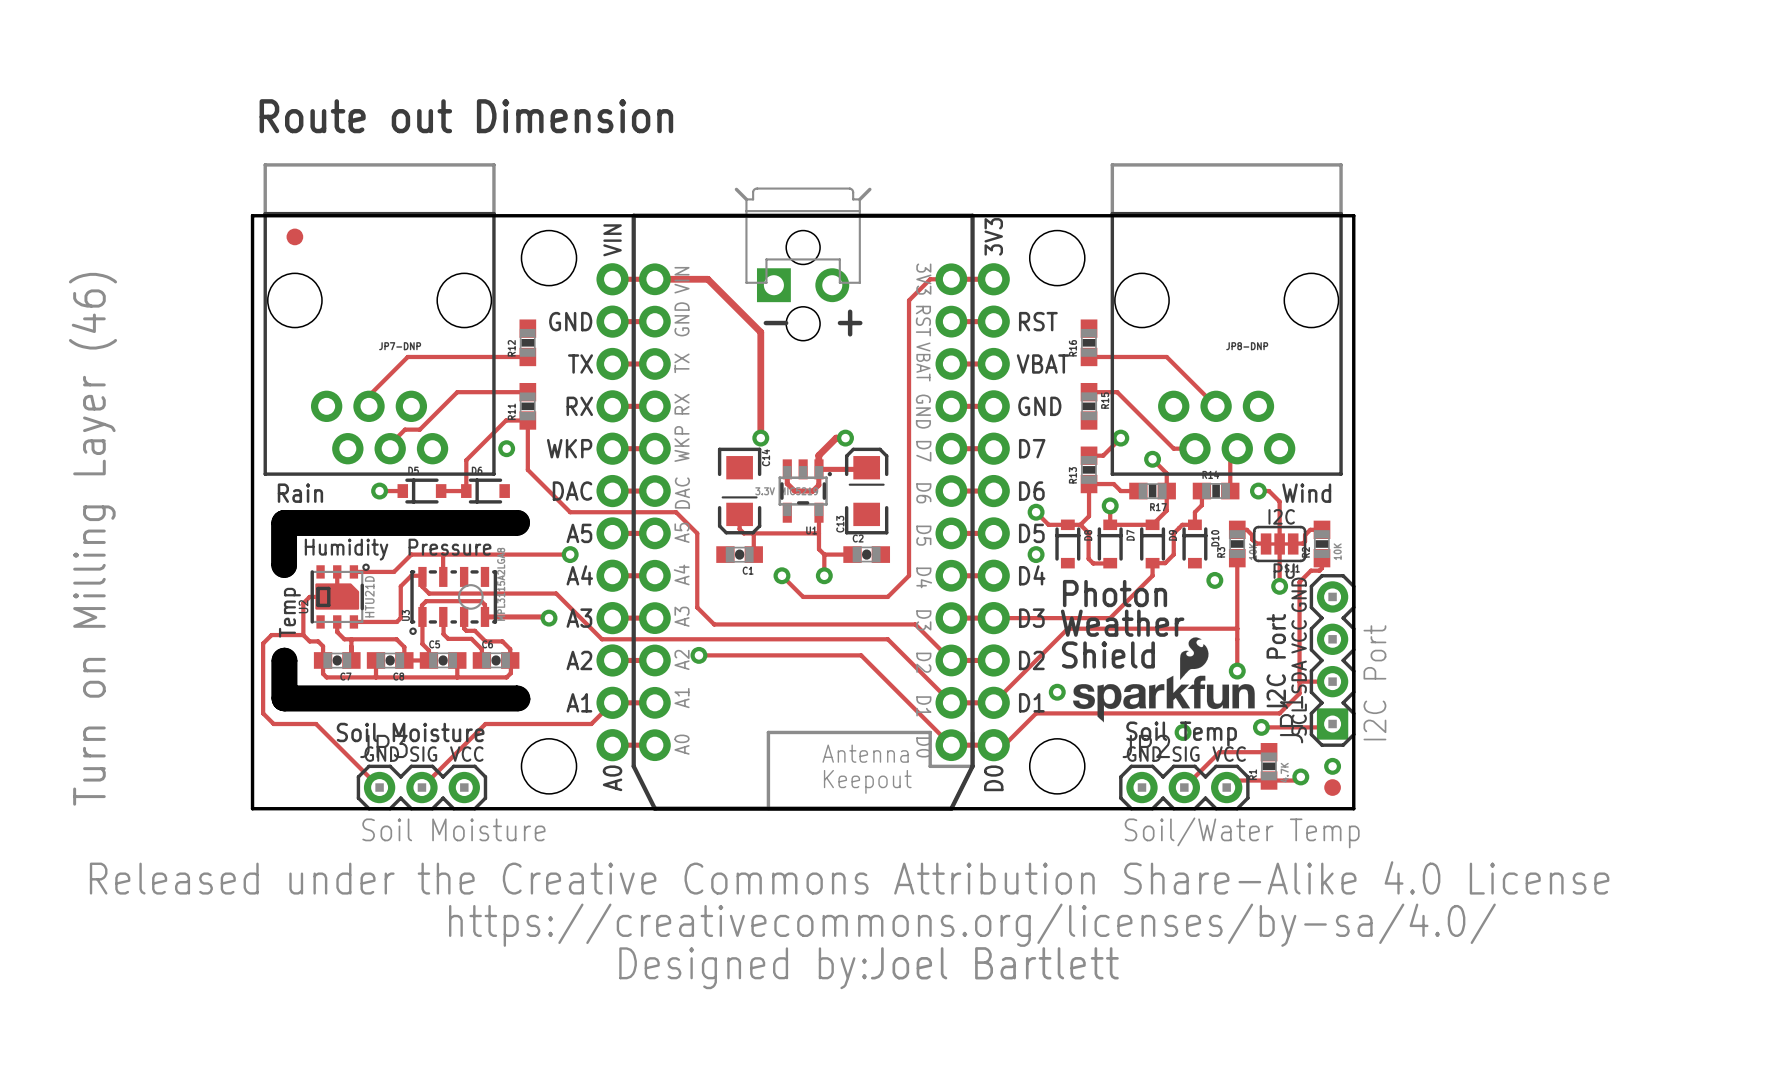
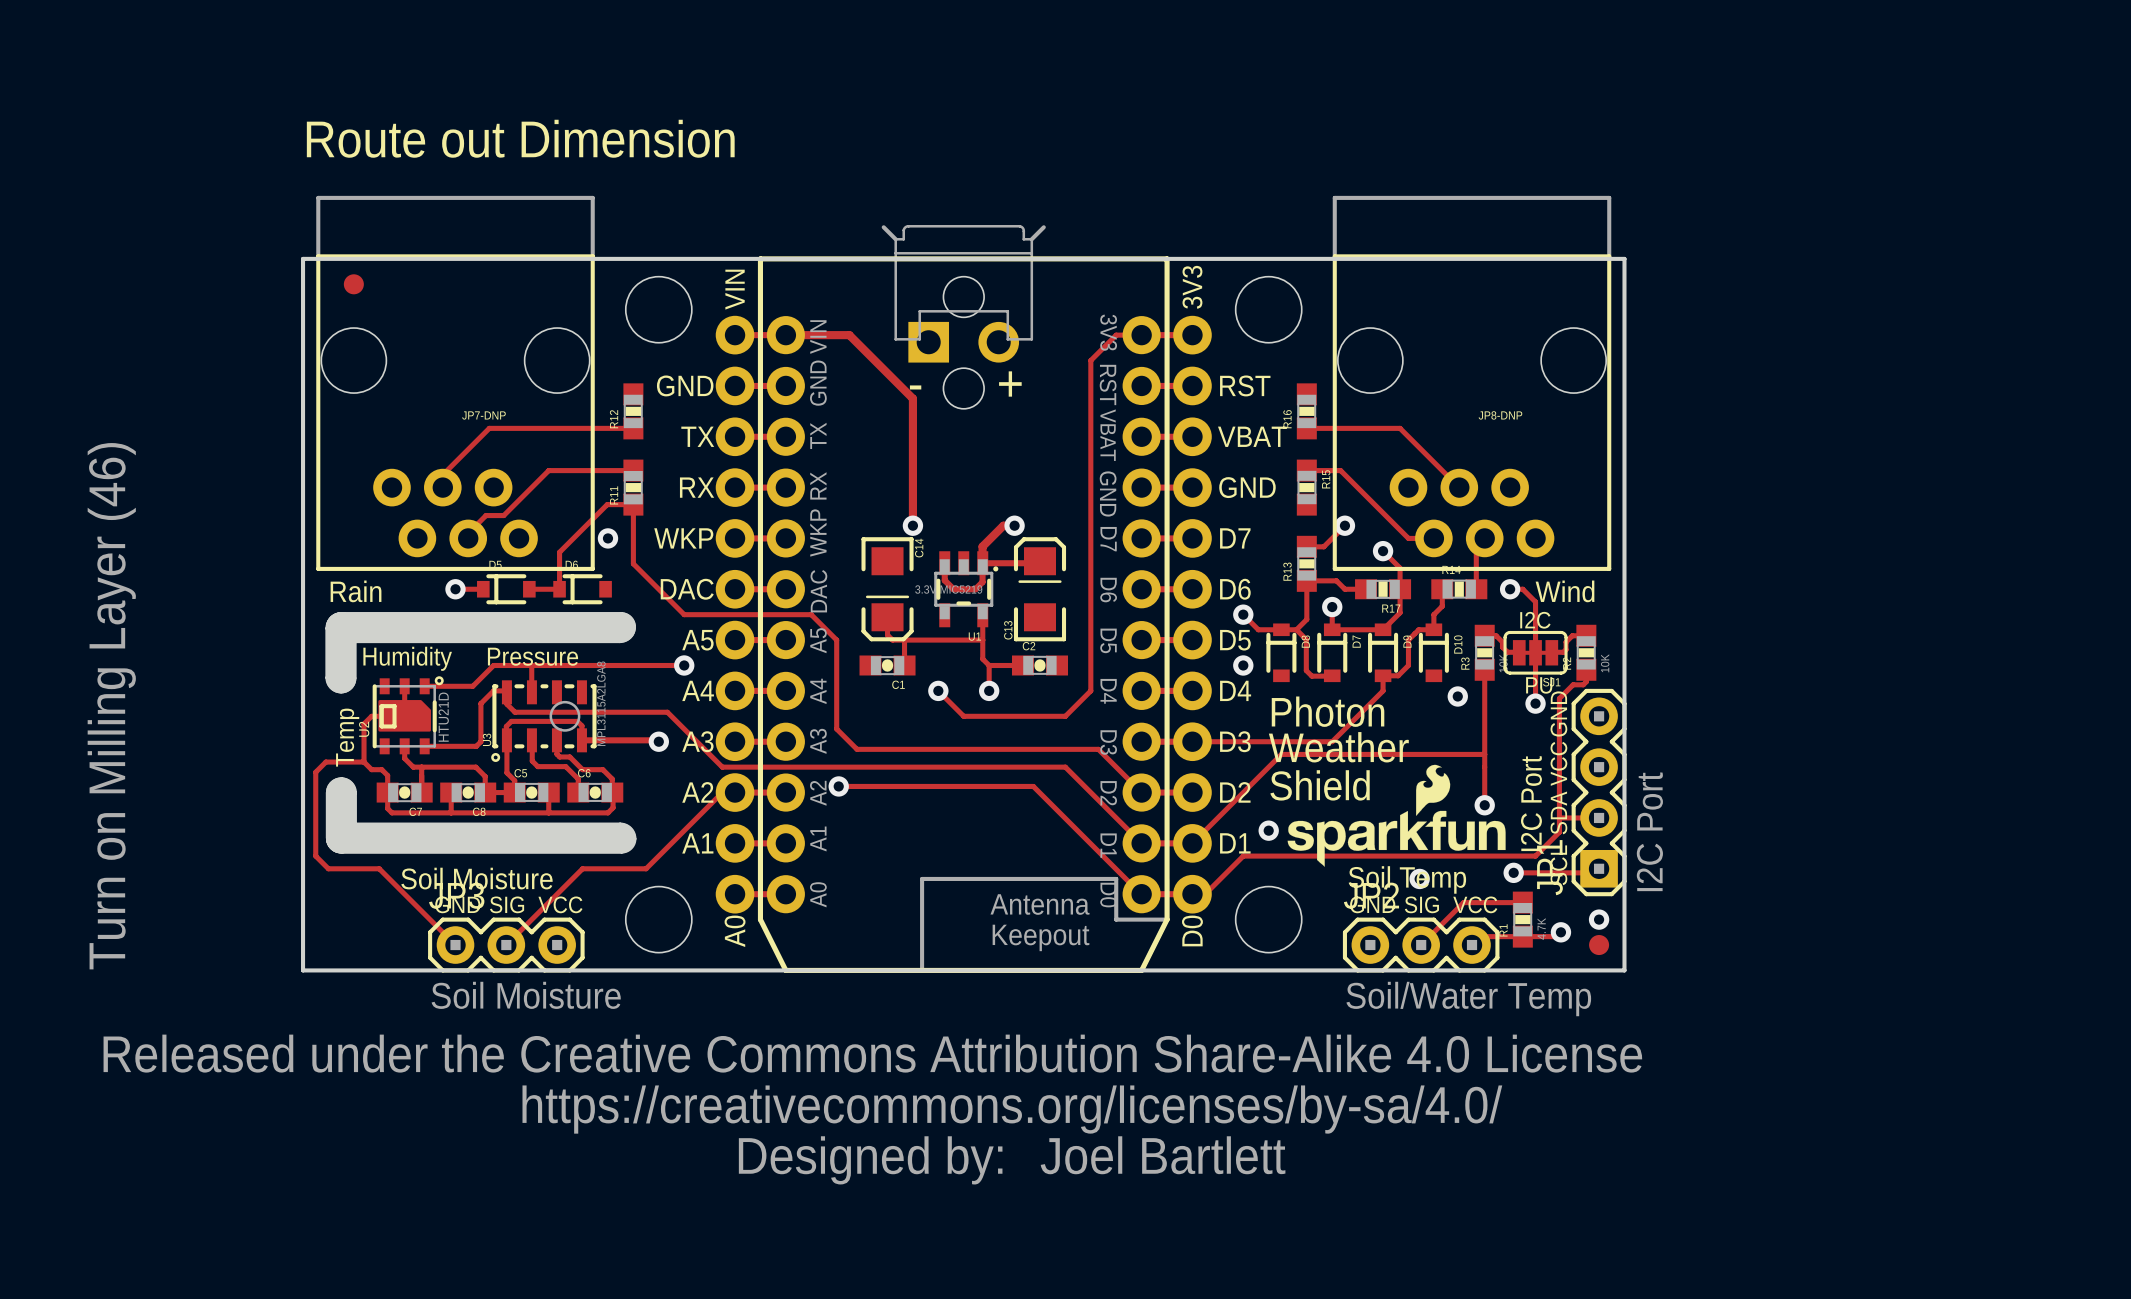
track: (612, 702) (591, 724) (538, 724) -> (735, 792) (722, 792) (646, 868)

